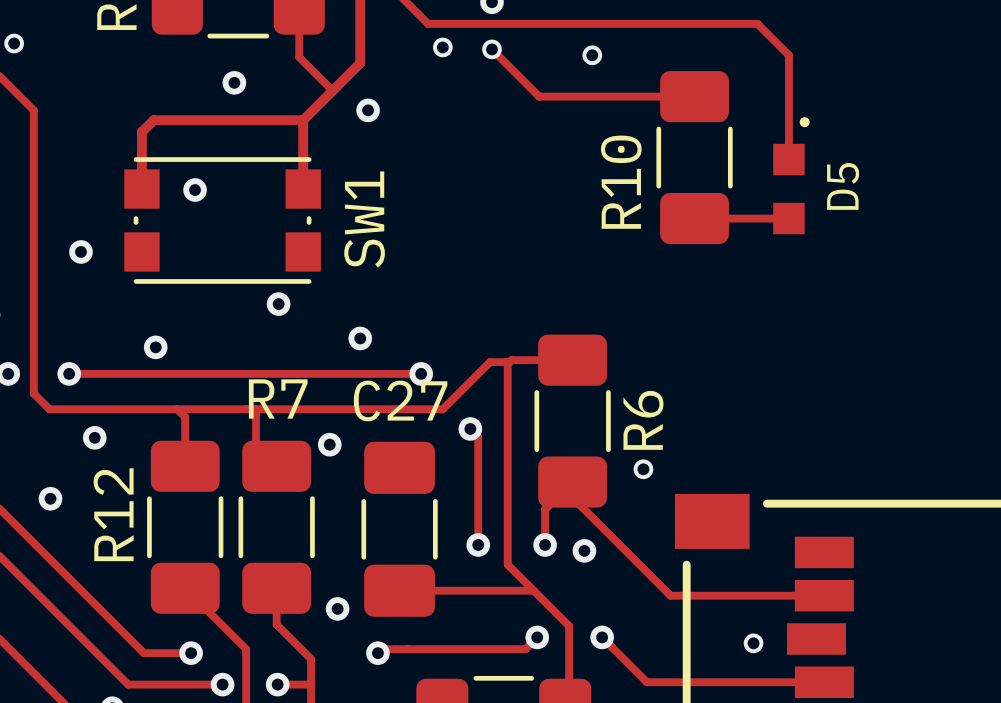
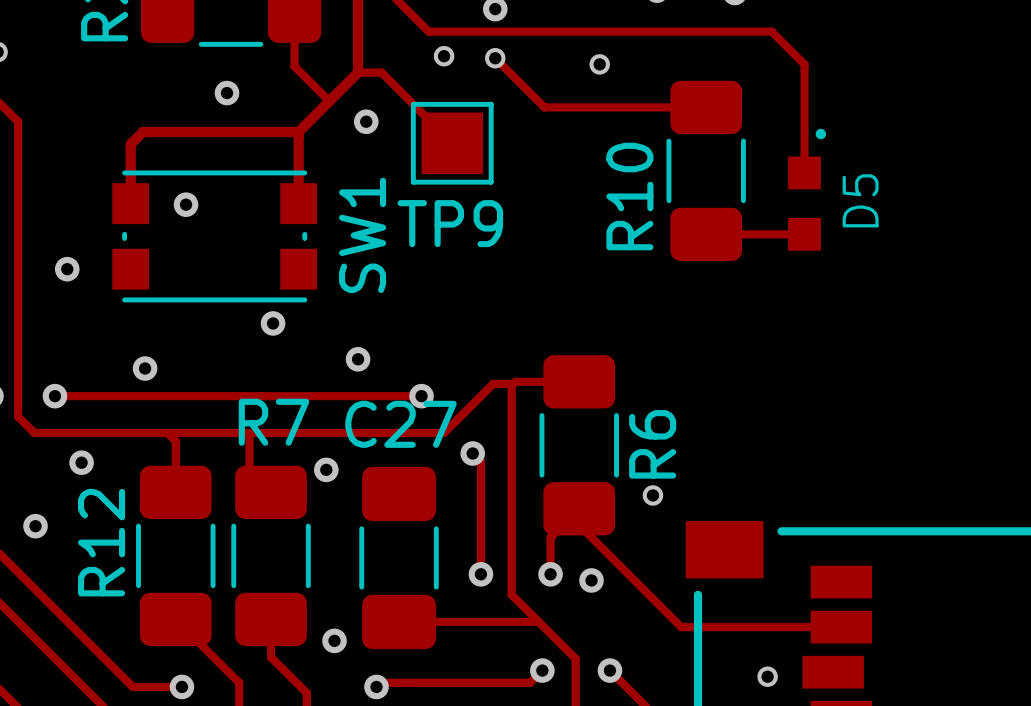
track: none -> (358, 72) (381, 72) (452, 143)
TP9: none -> (452, 143)

